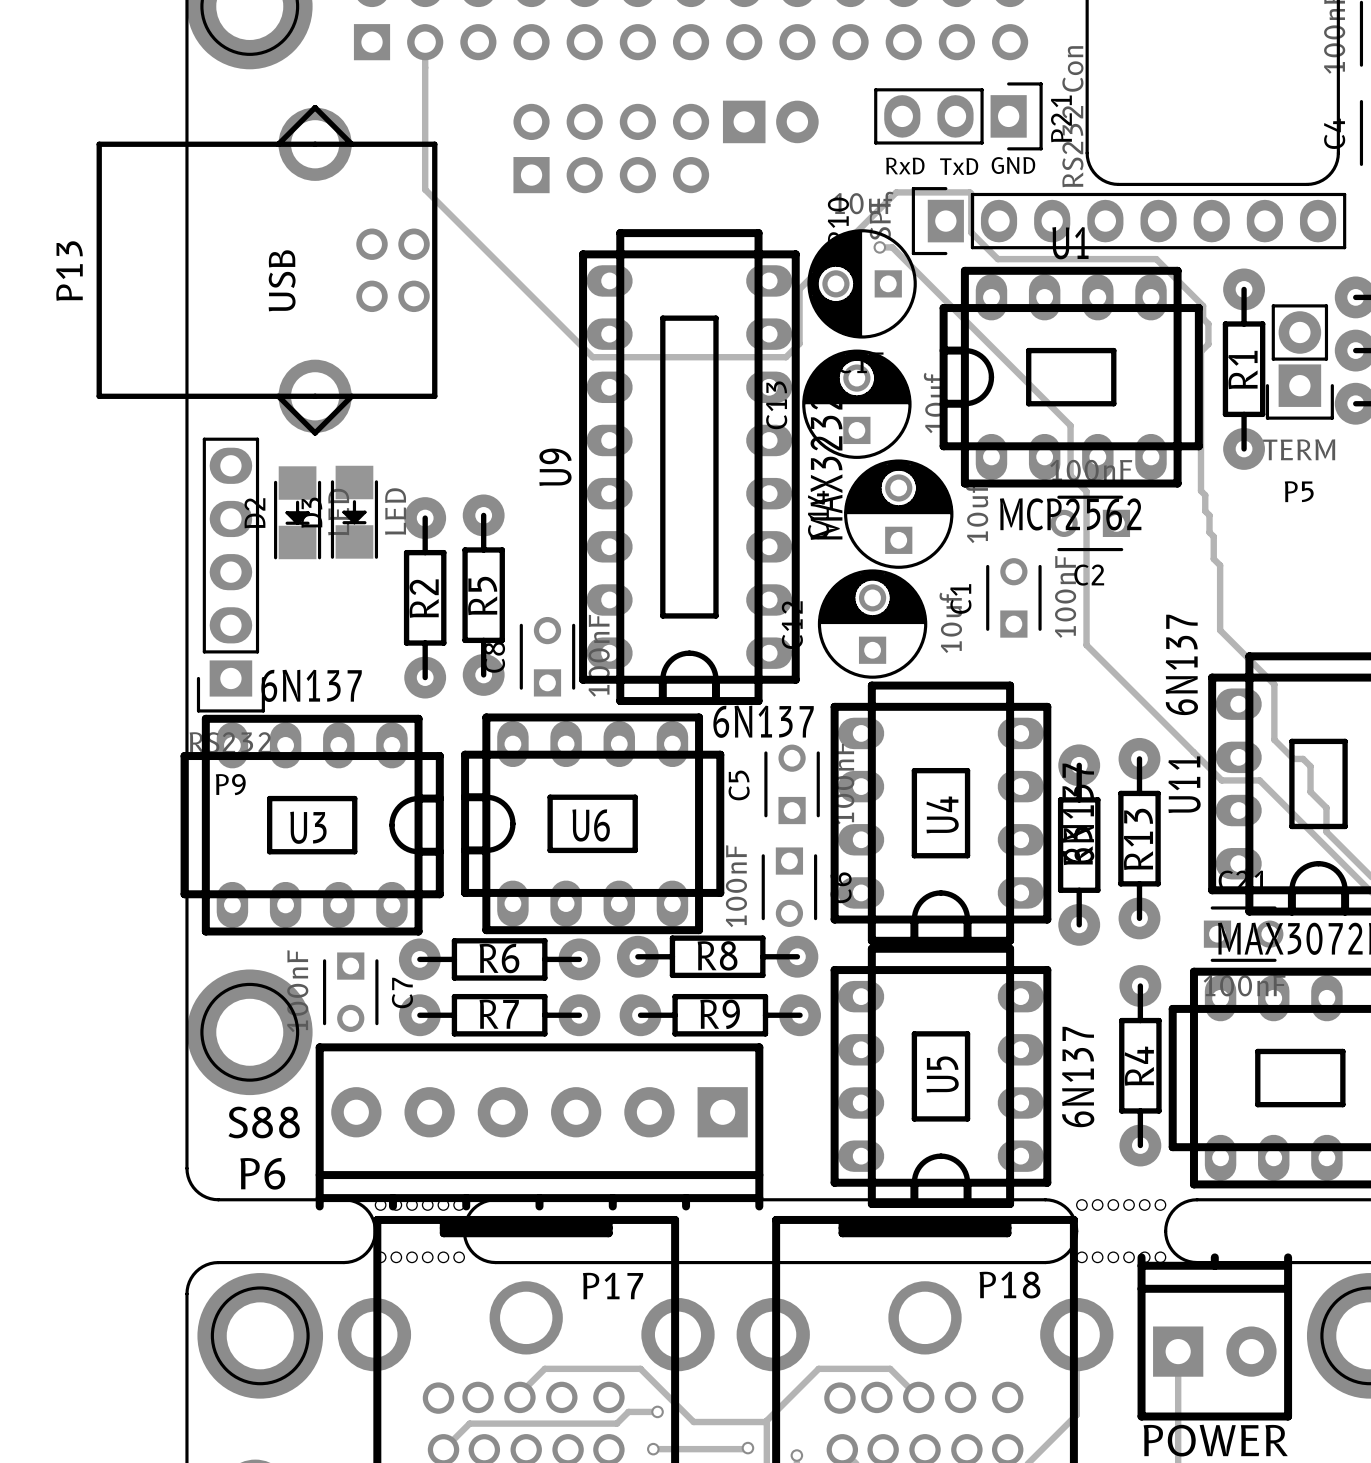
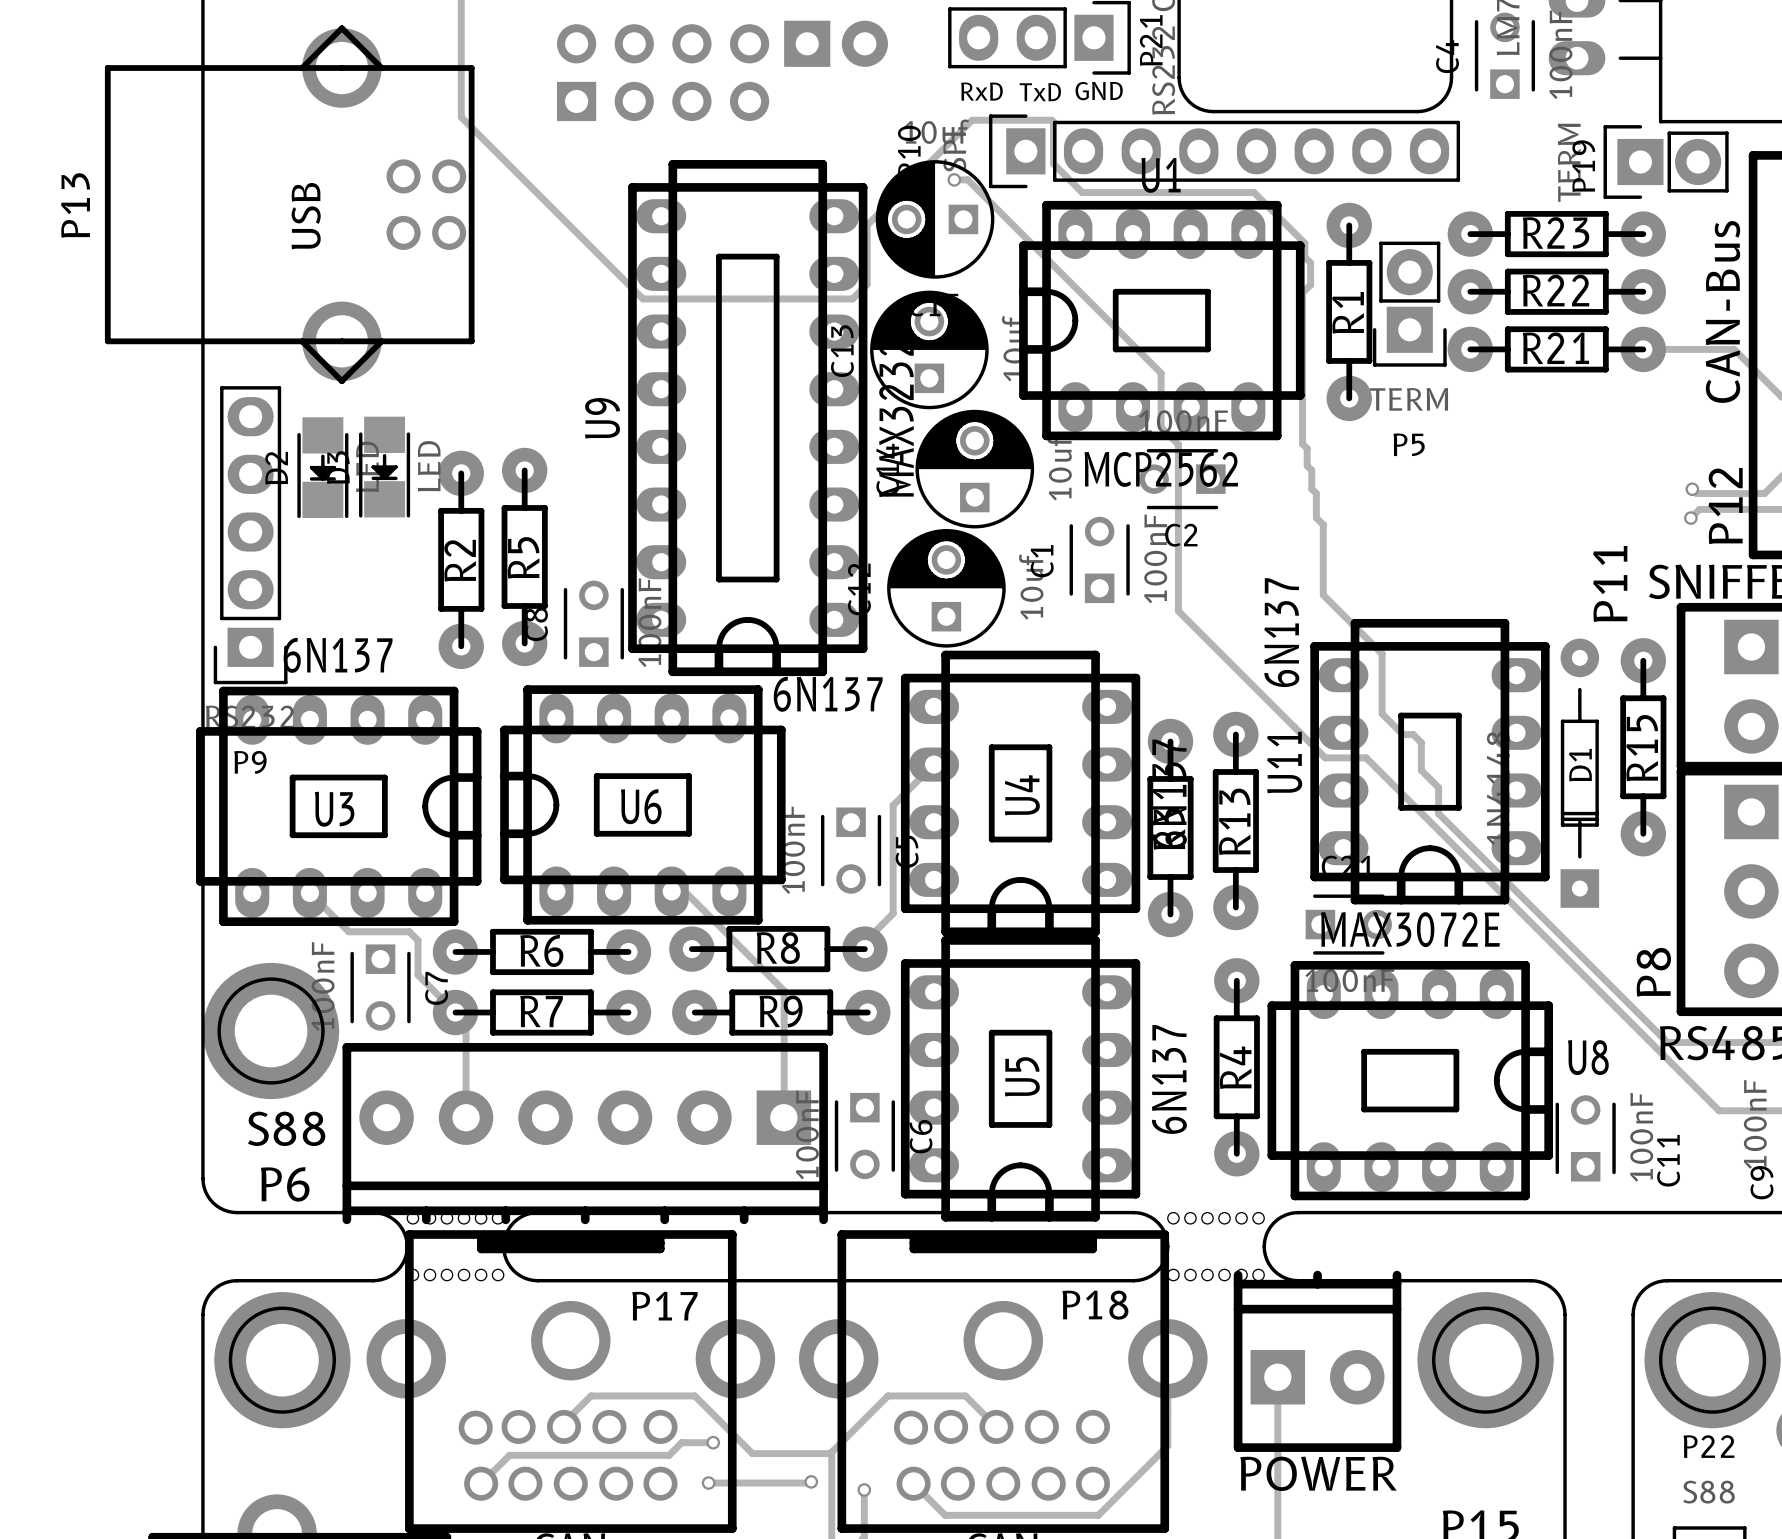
C5 rotation: 0° (792, 784) -> 180° (851, 850)
C5 position: (792, 784) -> (851, 850)
track: none -> (934, 764) (893, 805) (893, 913) (864, 941) (864, 949)
C6 position: (789, 887) -> (864, 1136)
track: none -> (671, 891) (684, 891) (784, 990) (784, 1117)
track: none -> (309, 892) (348, 931) (409, 931) (418, 940) (418, 975) (466, 1023) (466, 1117)

